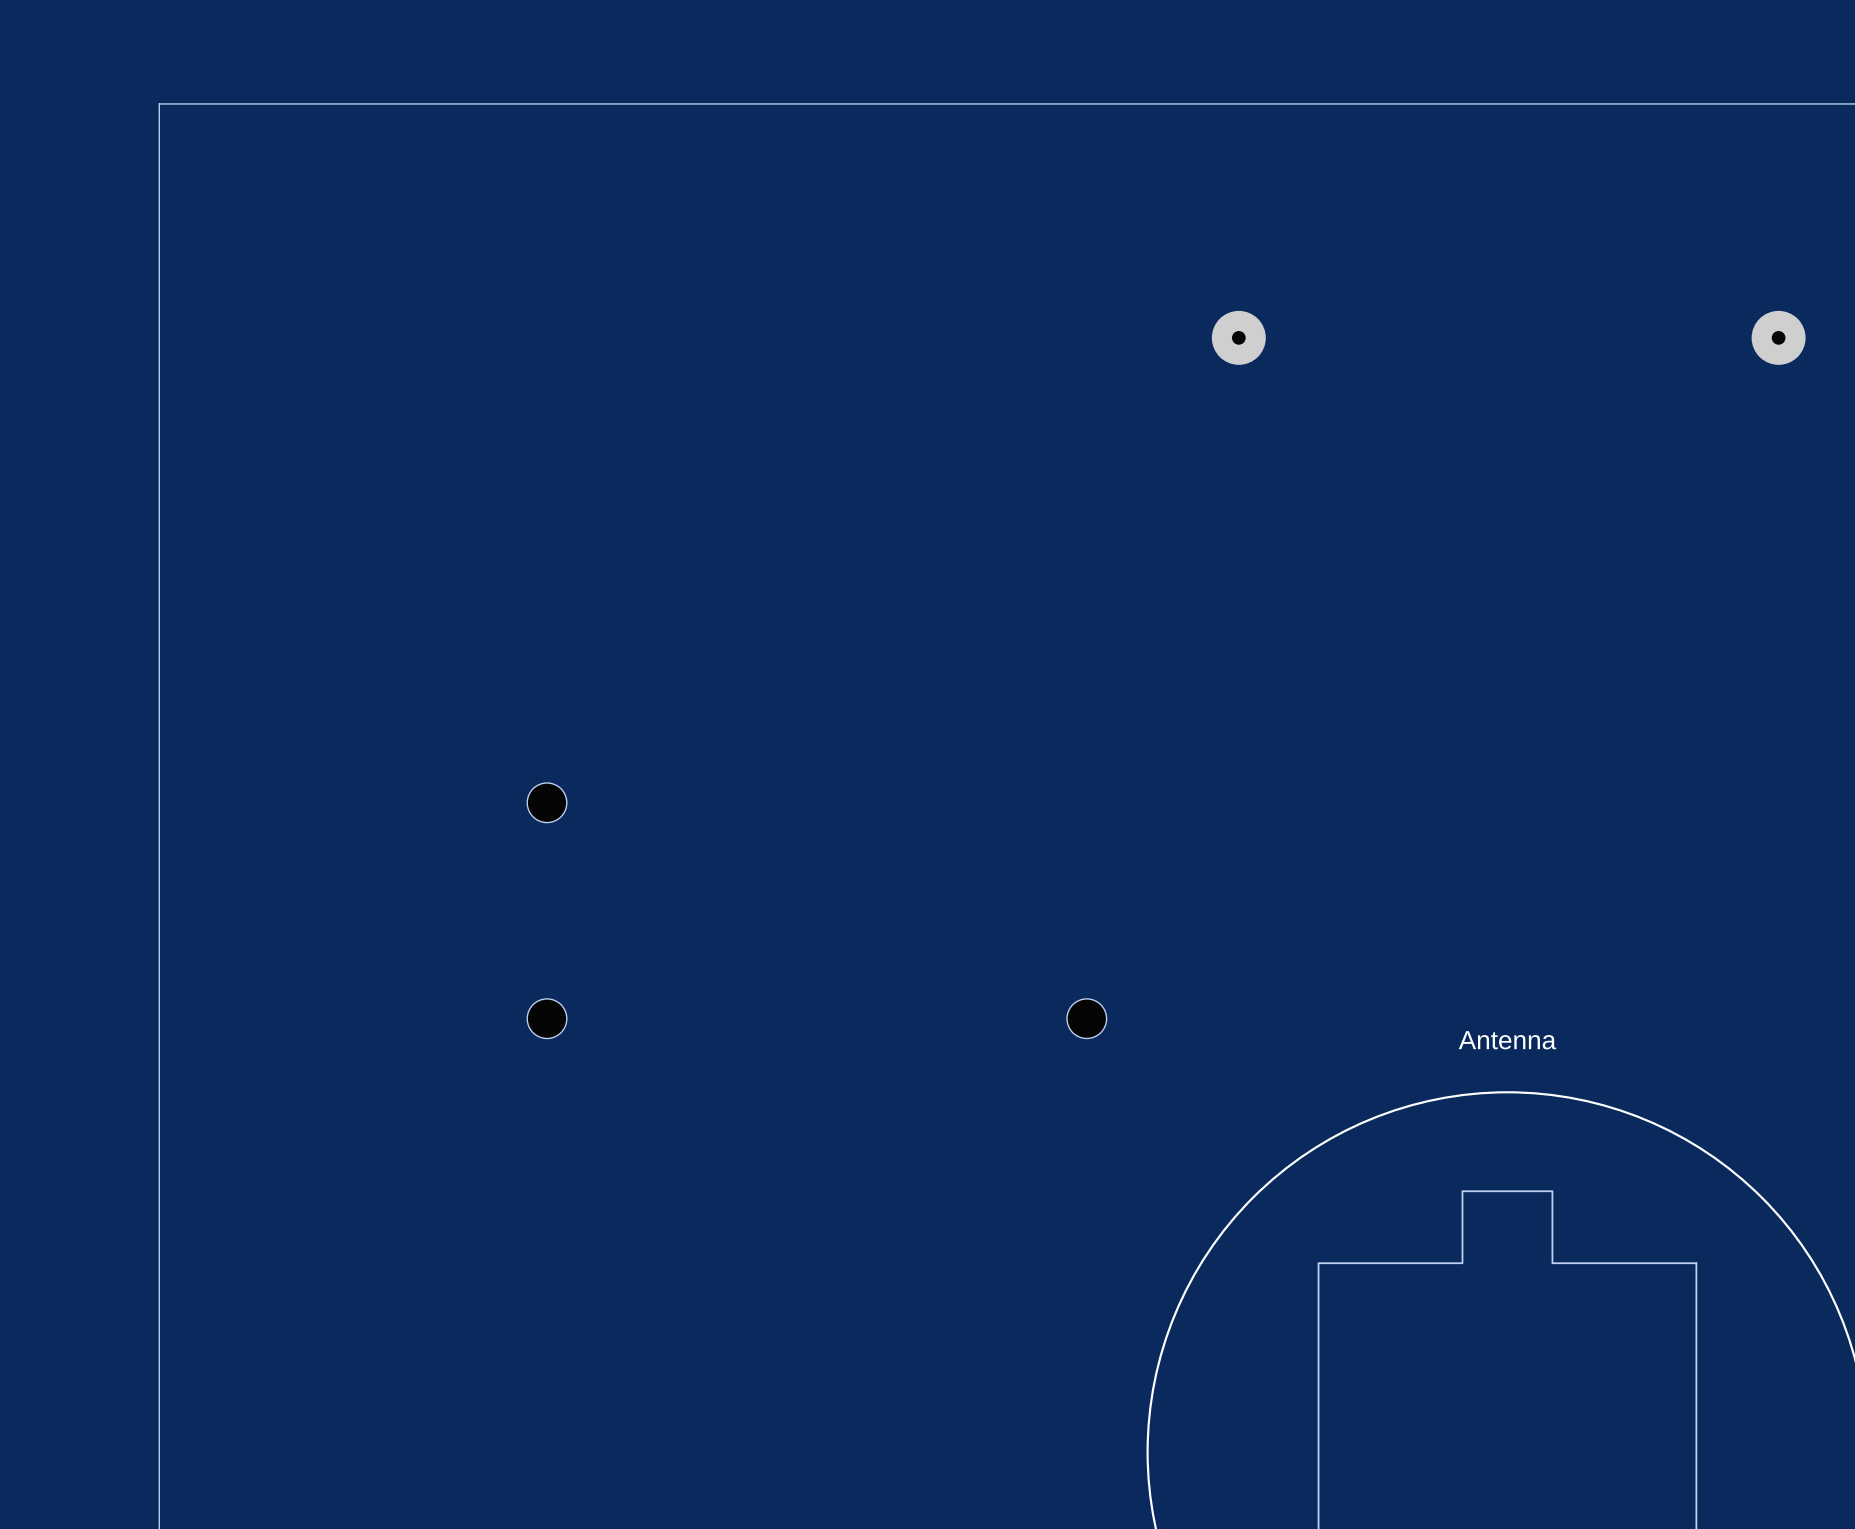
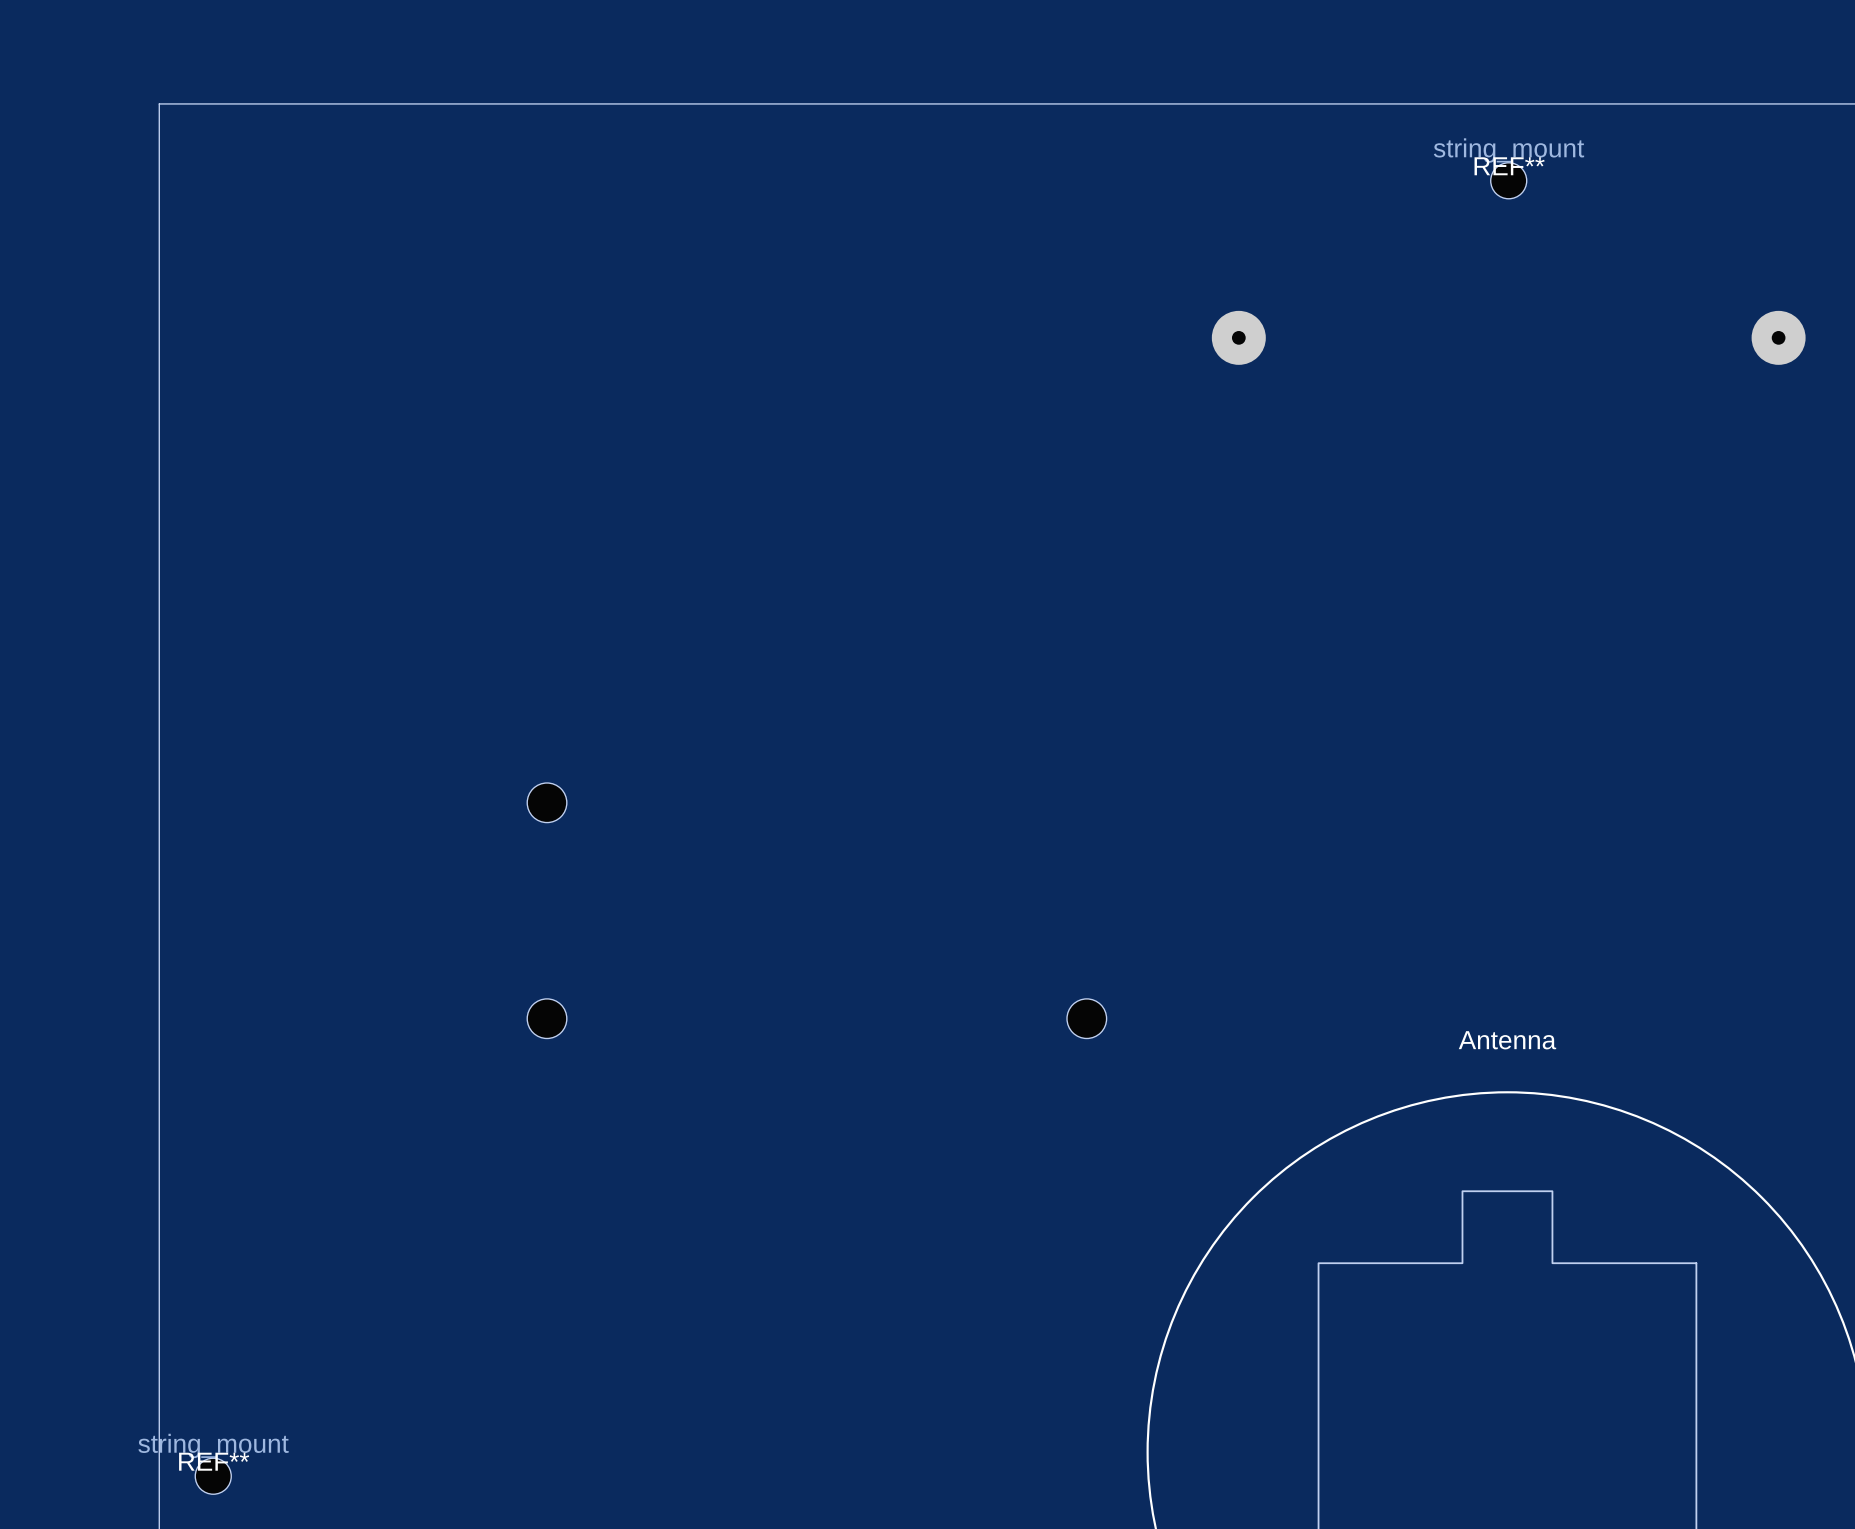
REF**: none -> string_mount (1508, 180)
REF**: none -> string_mount (213, 1476)

